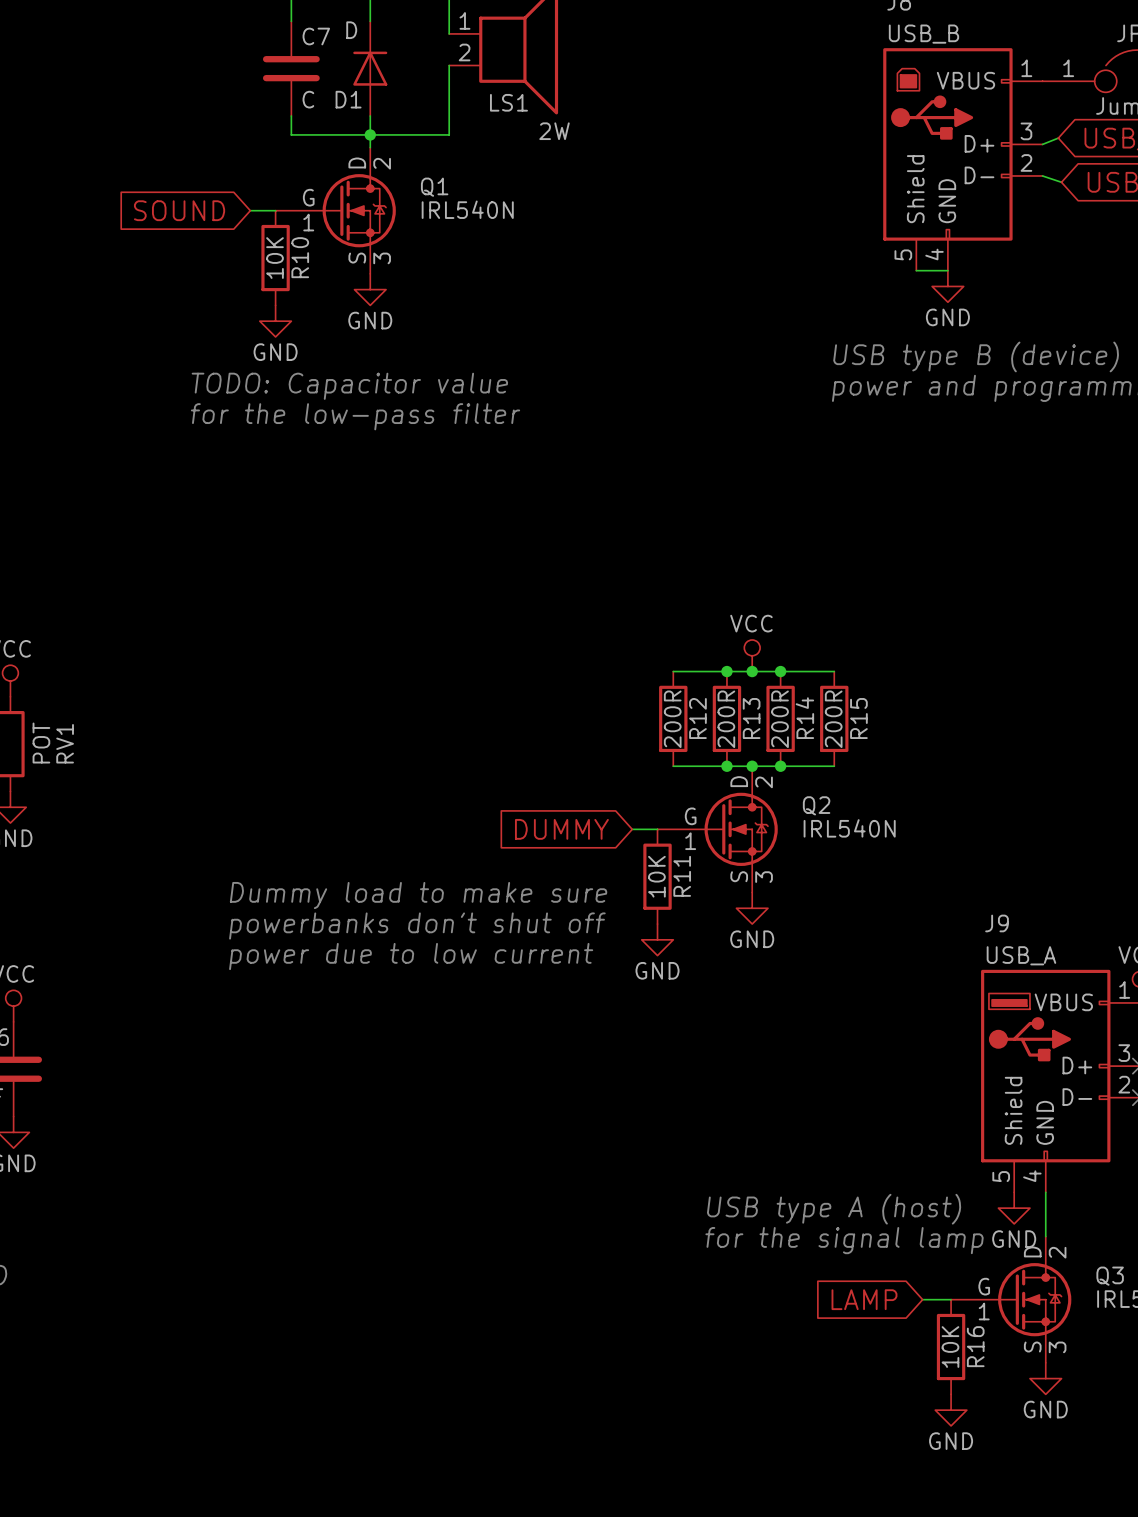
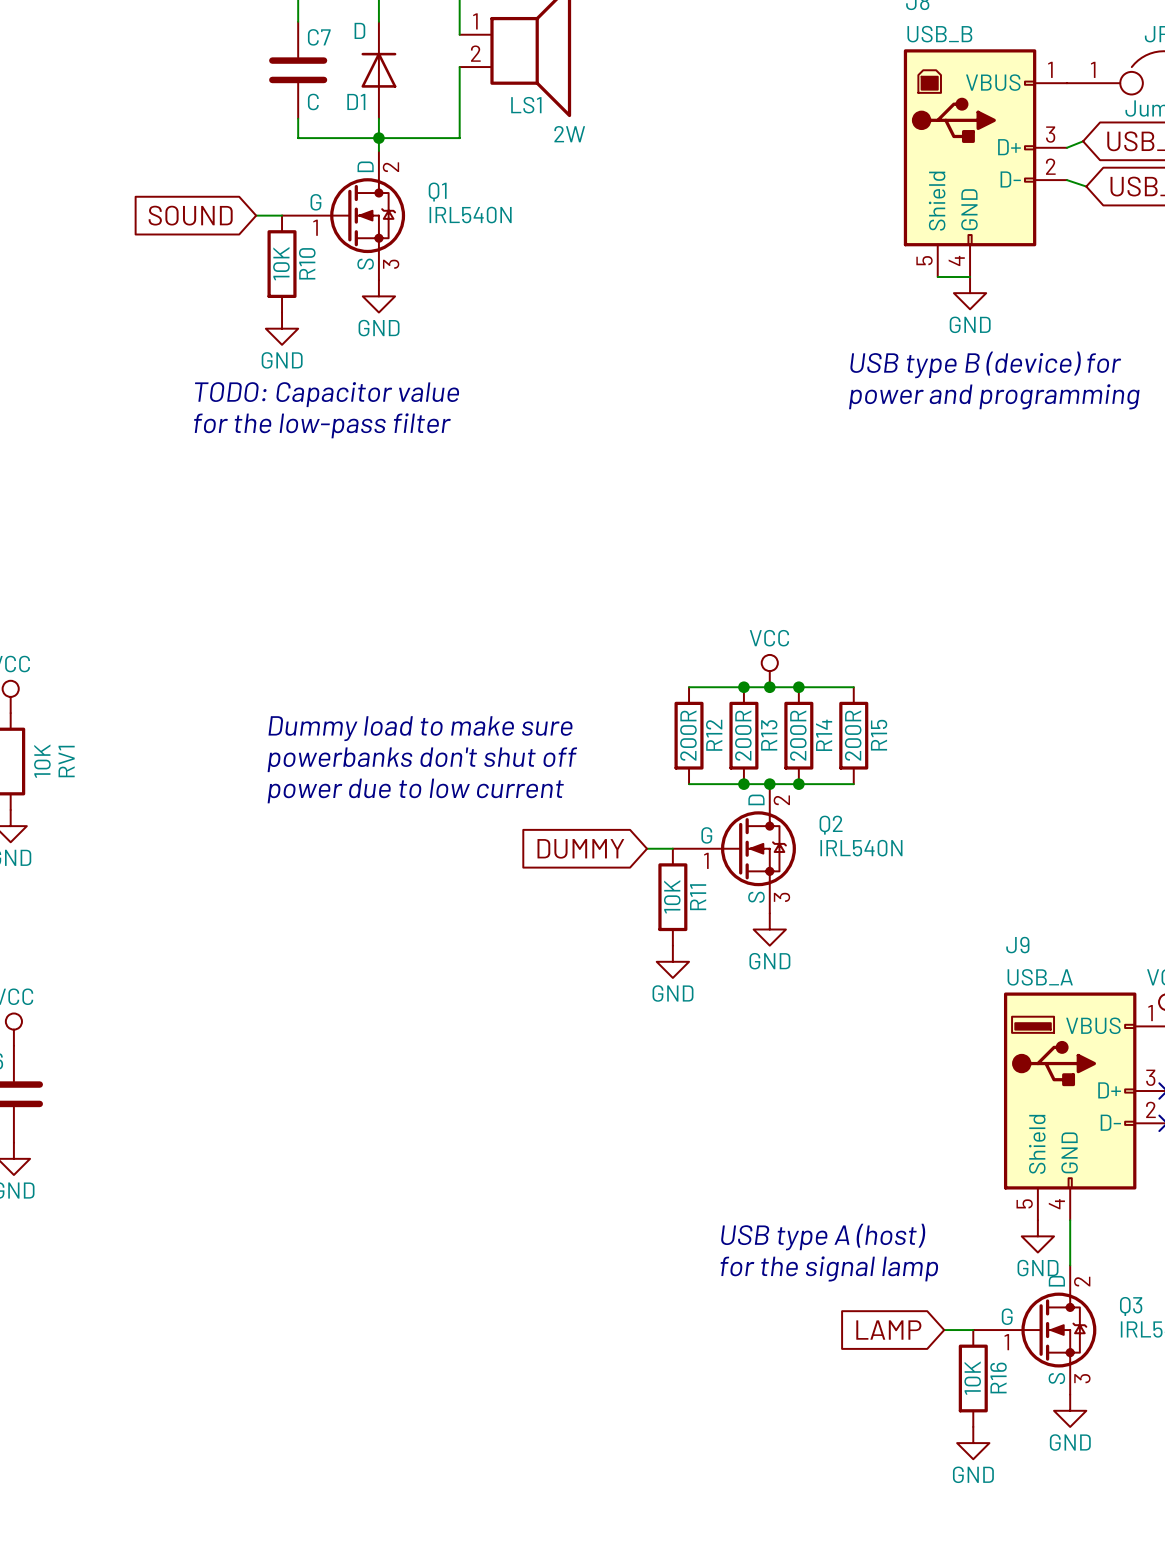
RV1 value: POT (41, 743) -> 10K (42, 761)
text position: Dummy load to make sure (418, 895) -> Dummy load to make sure (420, 728)
text position: powerbanks don't shut off (417, 926) -> powerbanks don't shut off (422, 759)
text position: power due to low current (411, 956) -> power due to low current (415, 790)

